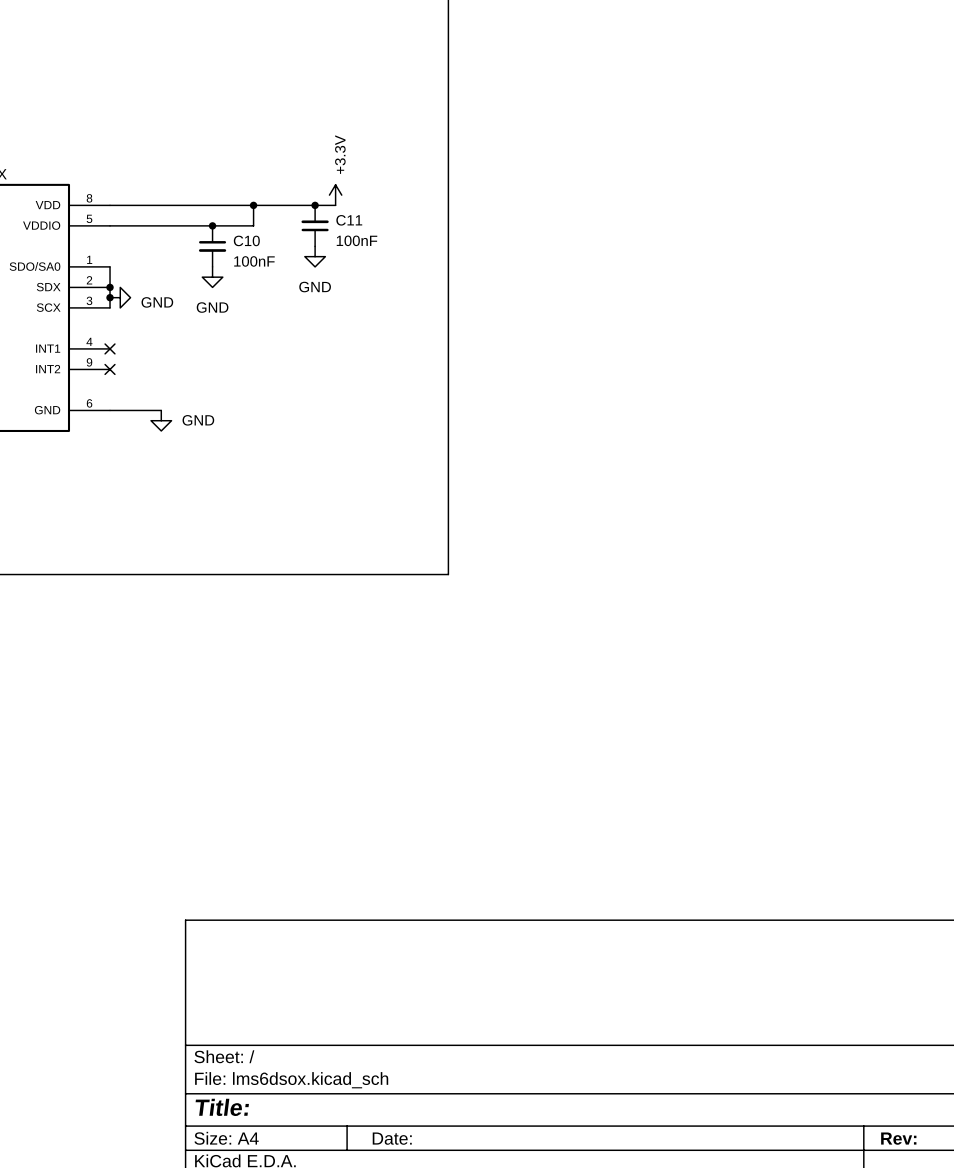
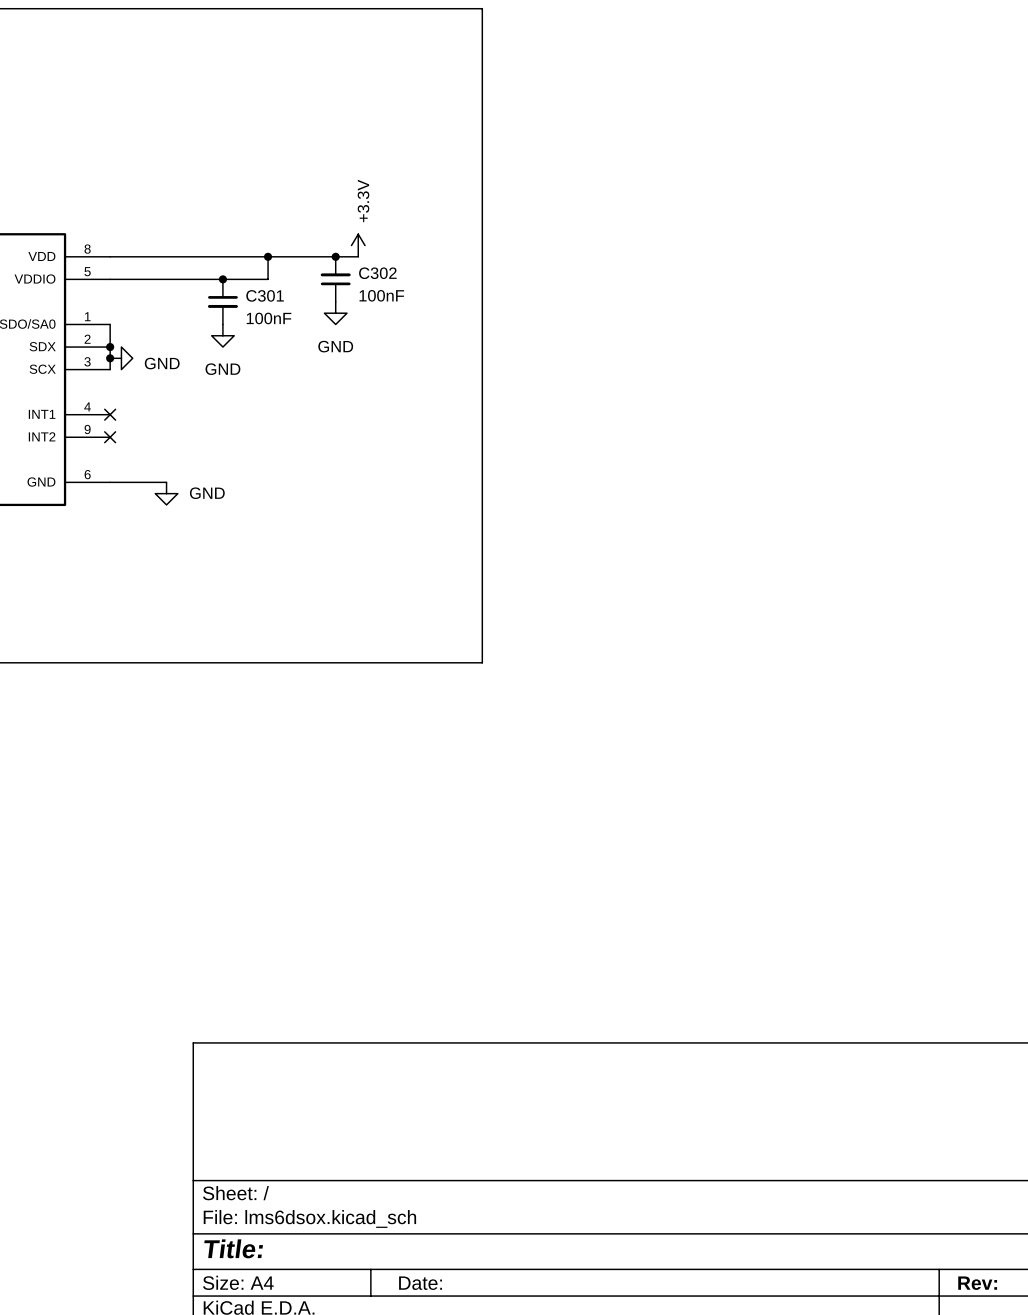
C11 name: C11 (349, 220) -> C302 (377, 273)
C10 name: C10 (246, 240) -> C301 (265, 295)

